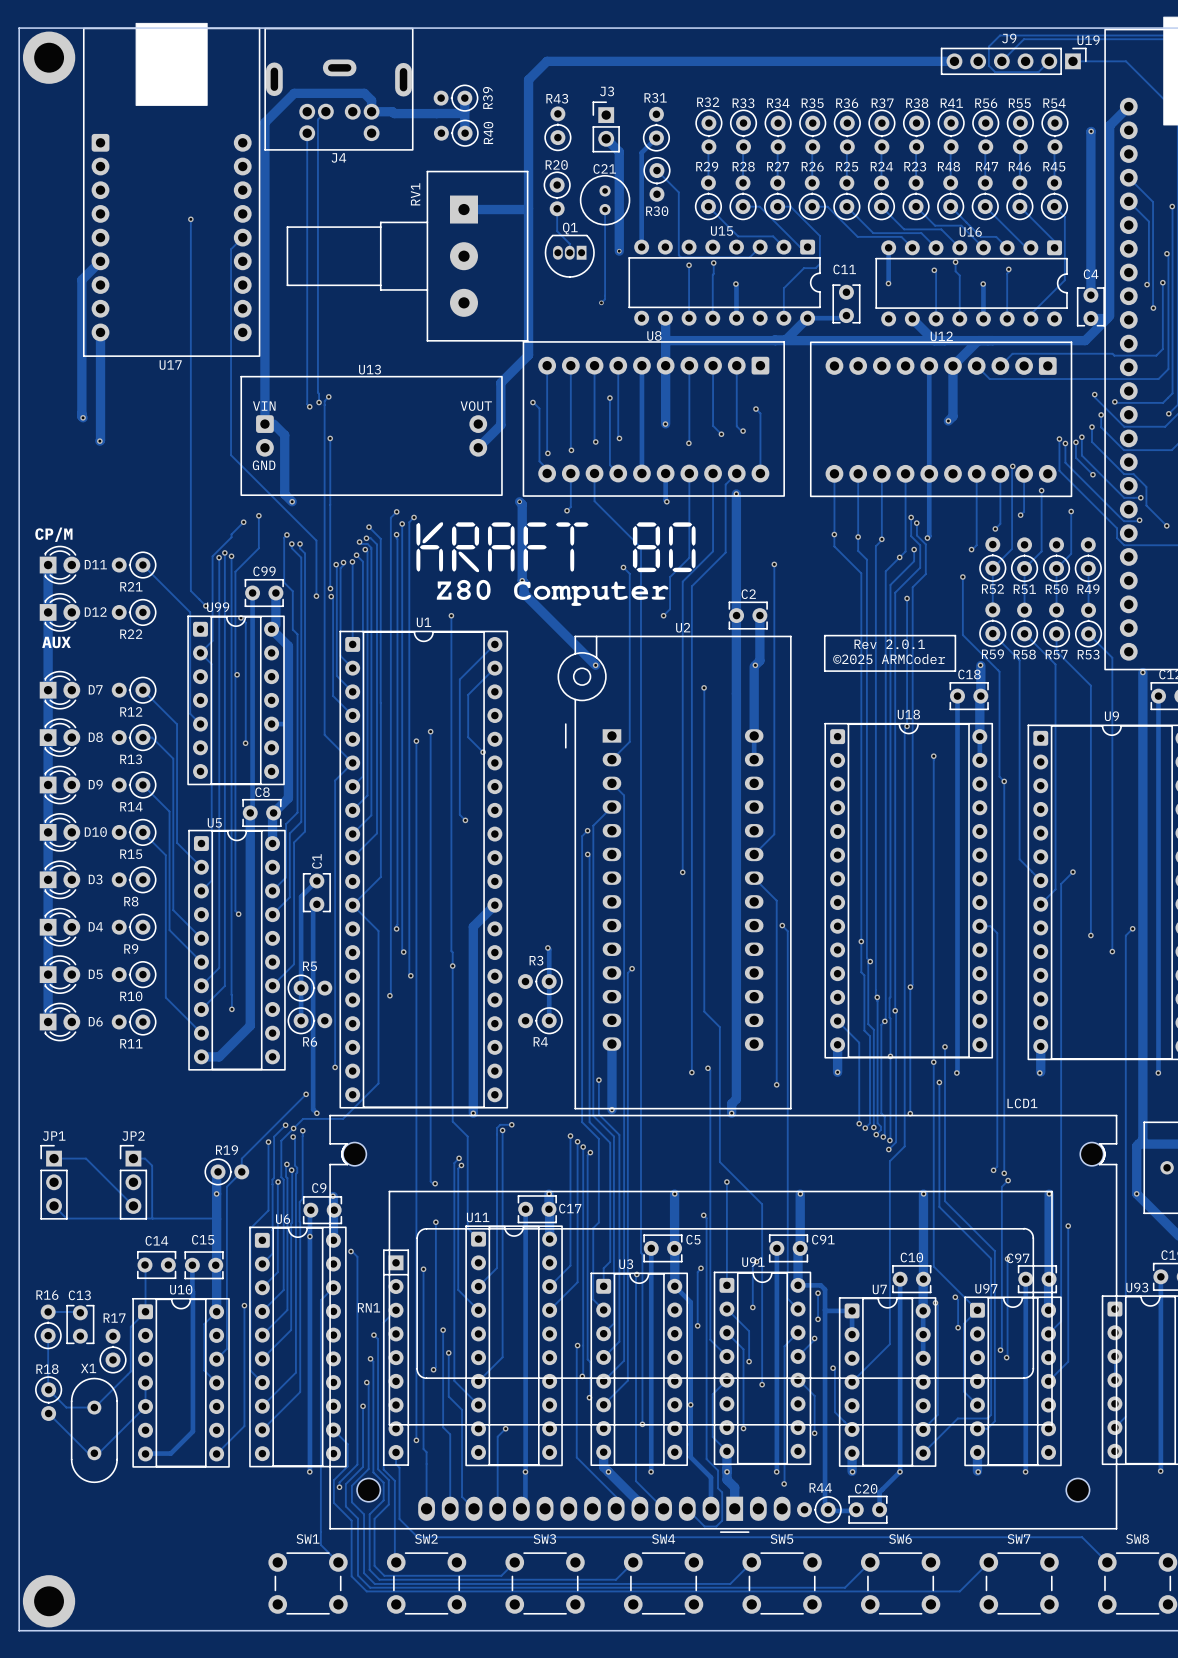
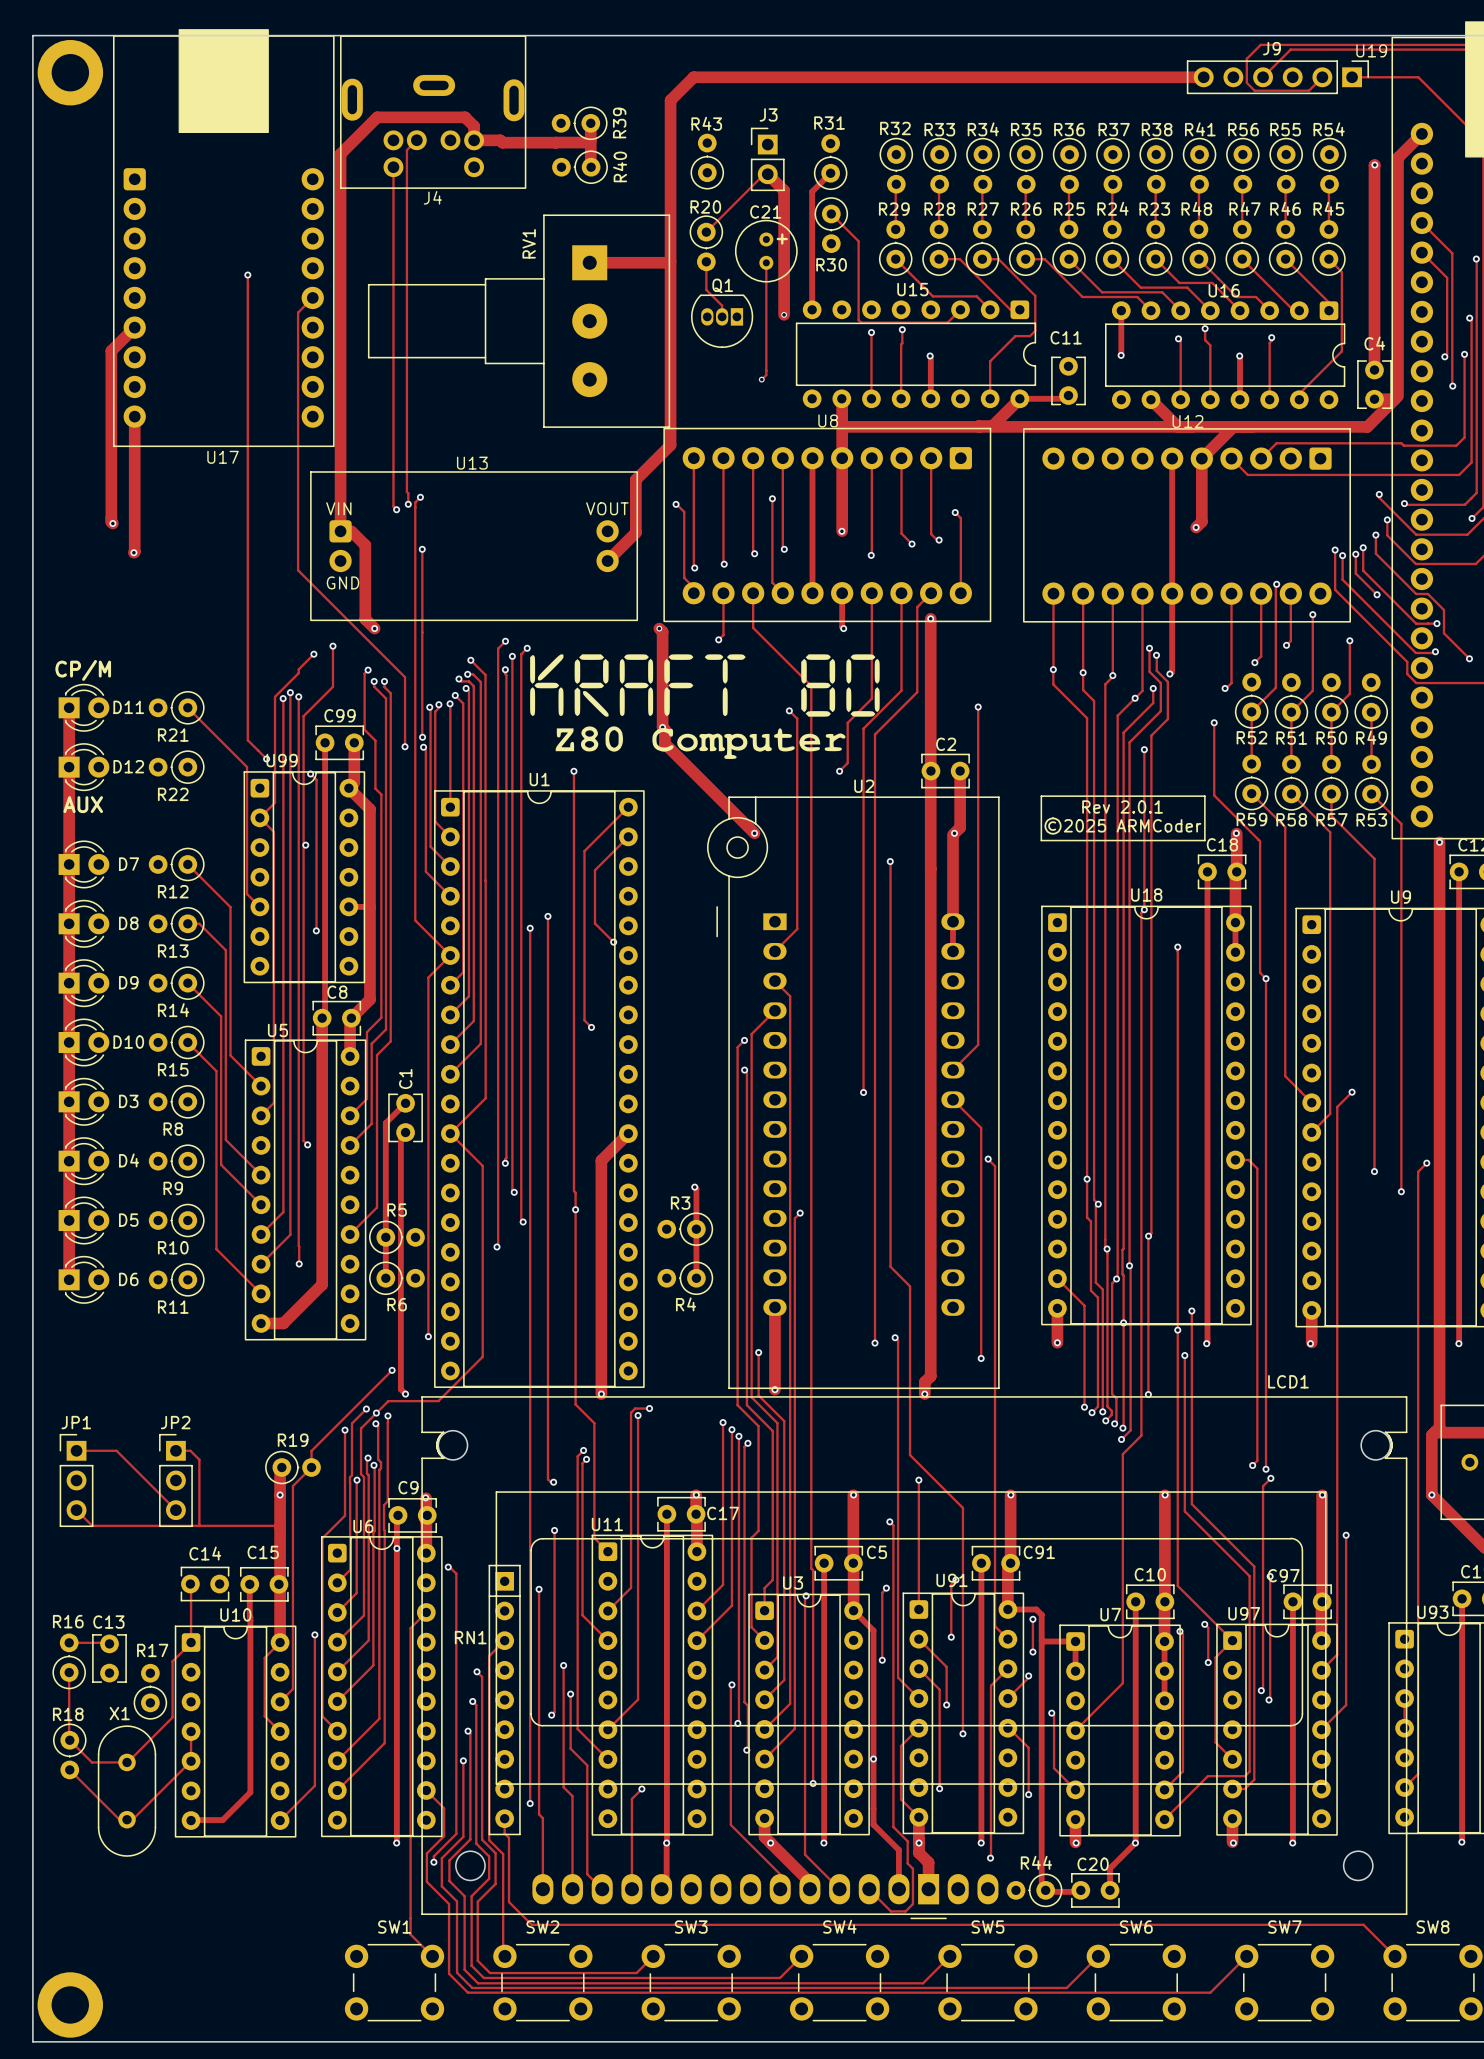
track: none -> (767, 174) (764, 174) (706, 232)
text: none -> + (782, 239)

